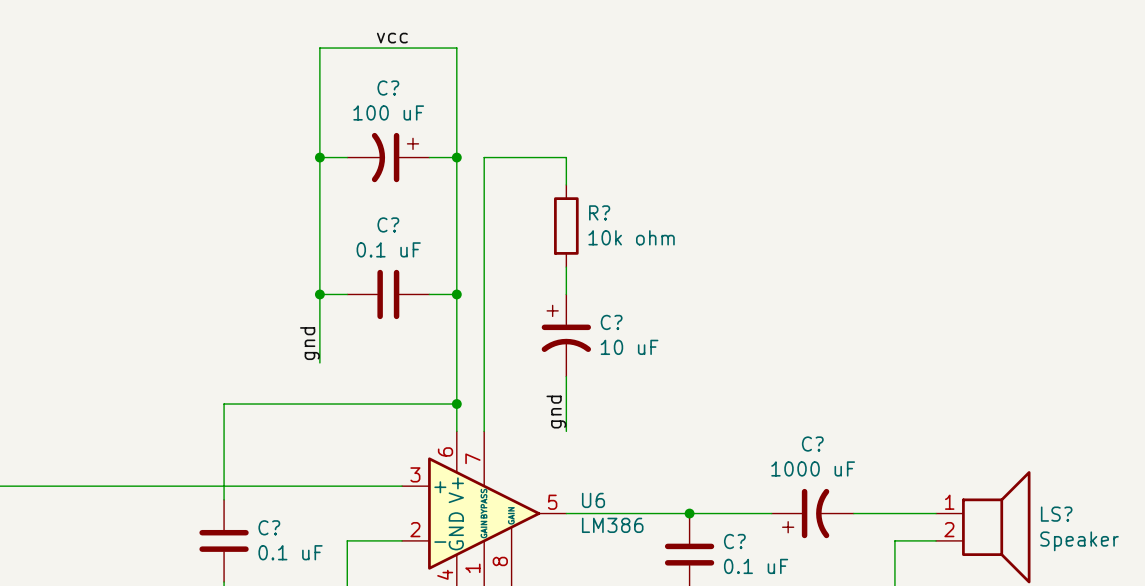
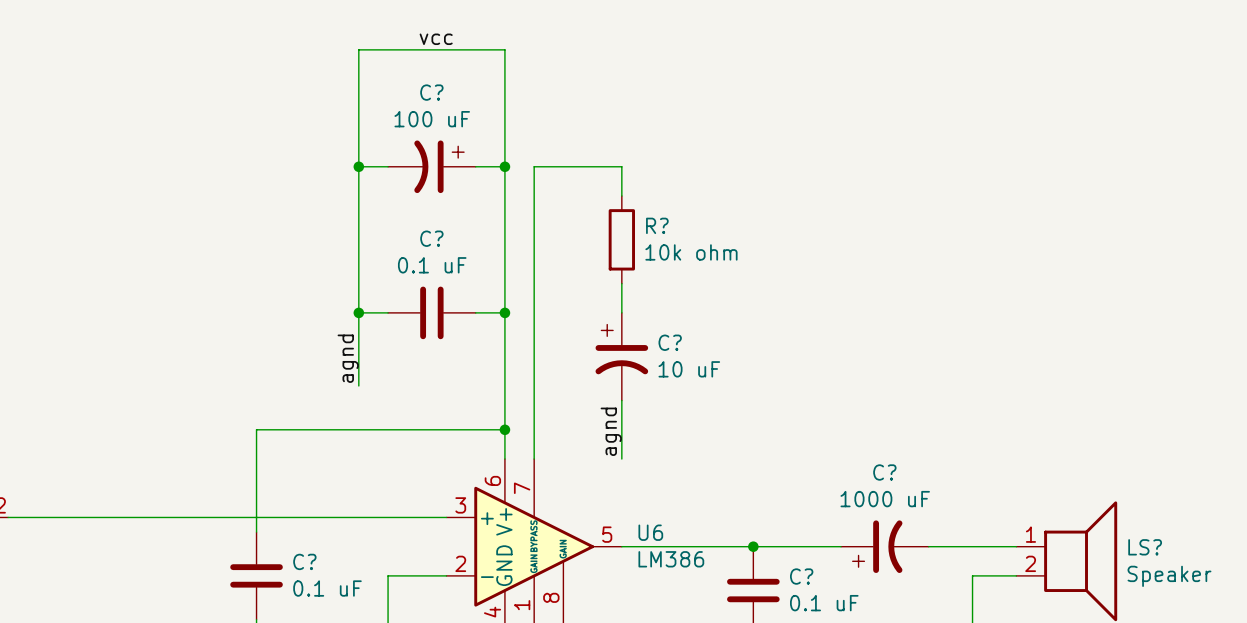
label: gnd (309, 343) -> agnd (348, 358)
label: gnd (556, 412) -> agnd (611, 431)

